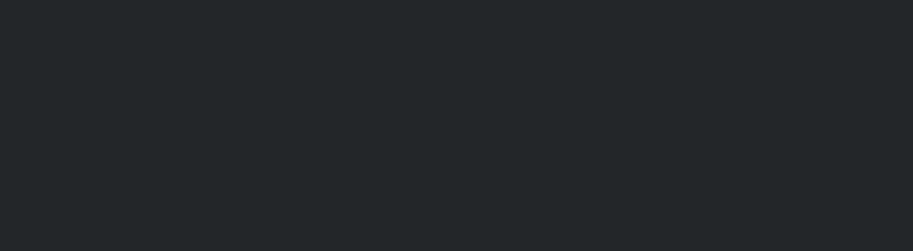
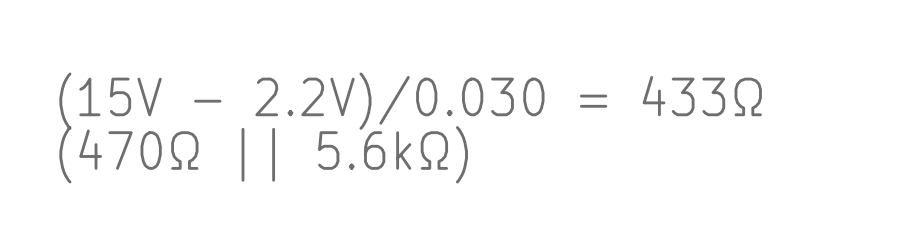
text: none -> (15V - 2.2V)/0.030 = 433Ω (410, 101)
text: none -> (470Ω || 5.6kΩ) (263, 154)

